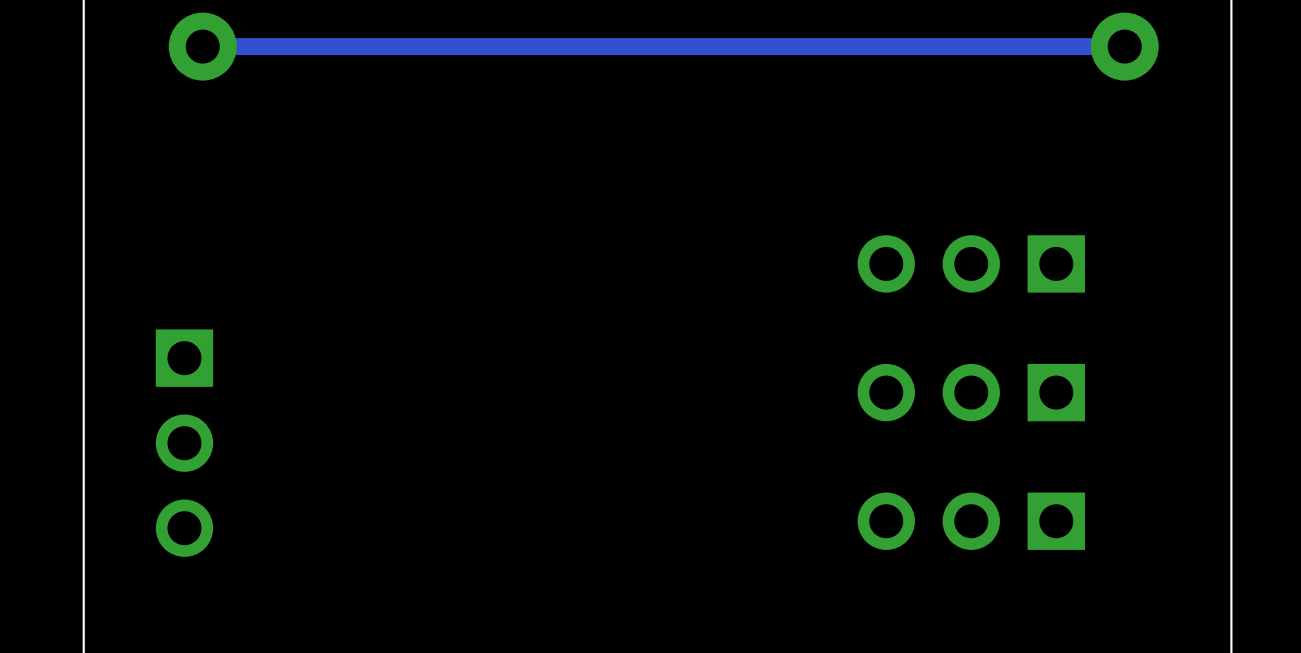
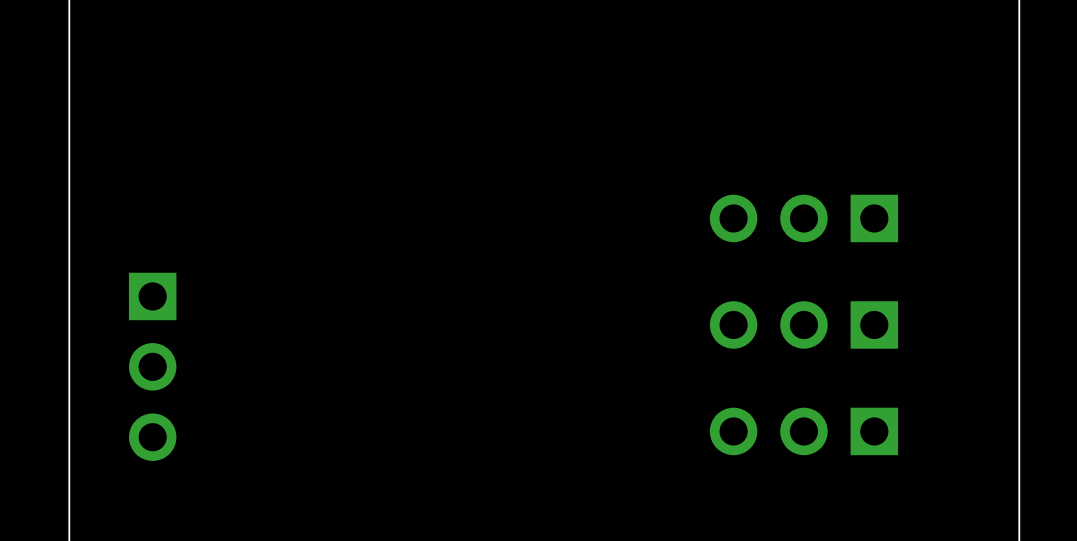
via: (202, 46) -> none
track: (1124, 46) (202, 46) -> none
via: (1124, 46) -> none

